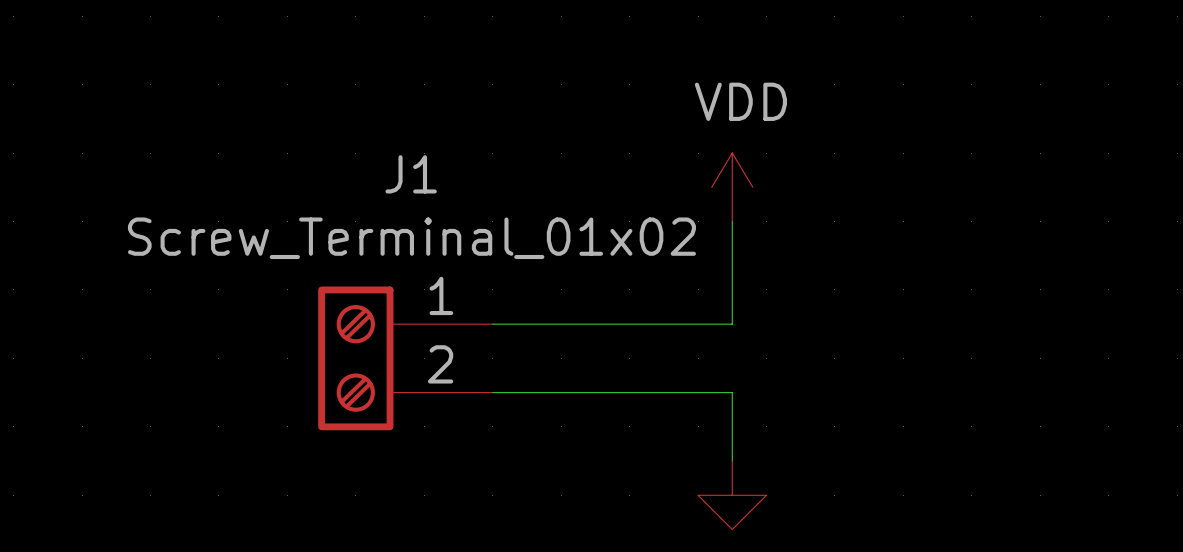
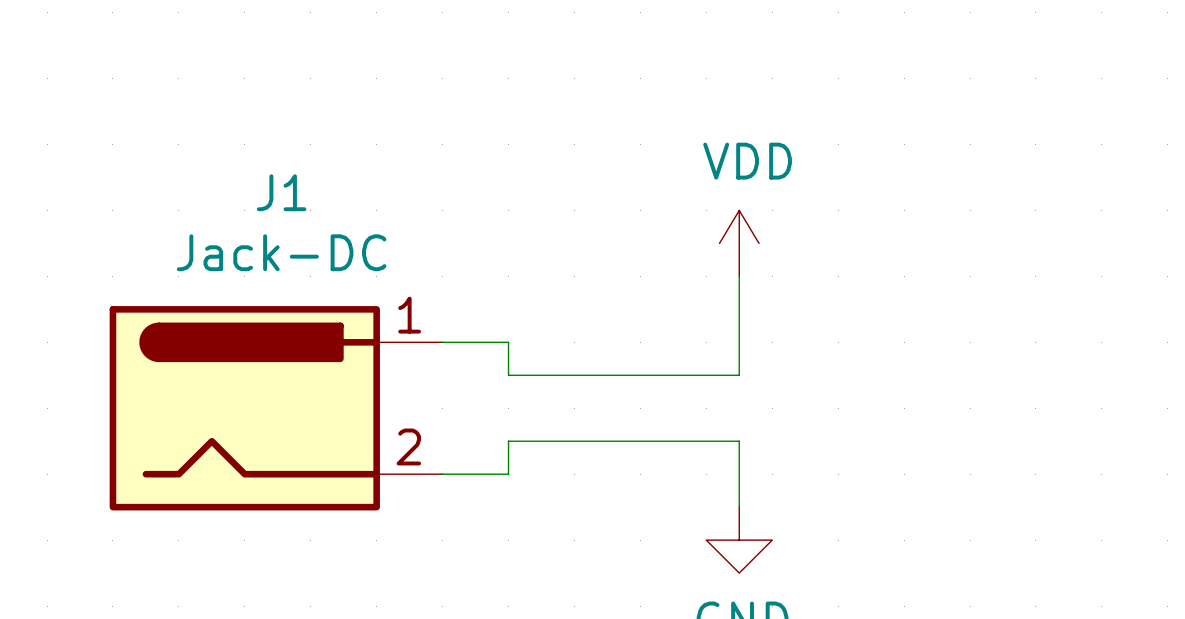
J1 value: Screw_Terminal_01x02 (411, 238) -> Jack-DC (281, 252)
J1 symbol: [318, 286, 493, 431] -> [109, 306, 443, 511]
wire: none -> (442, 342) (508, 342) (508, 375)
wire: none -> (508, 441) (508, 474) (442, 474)

